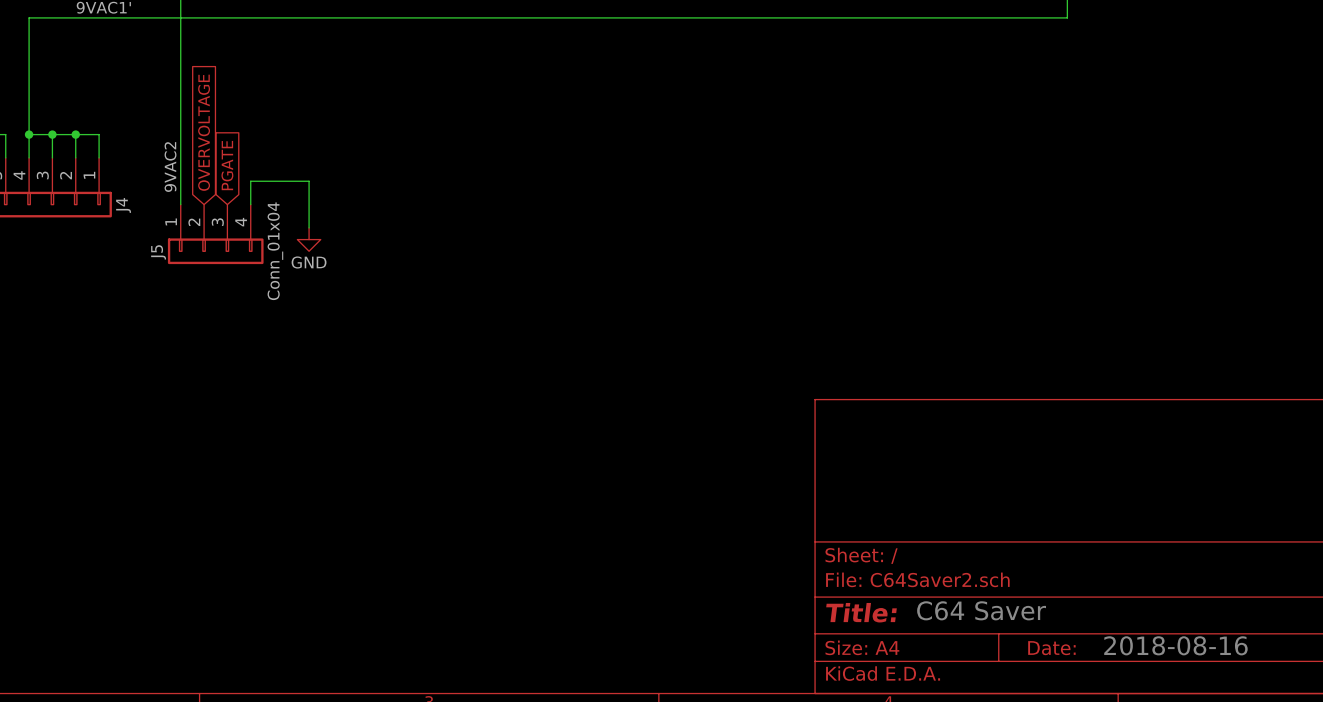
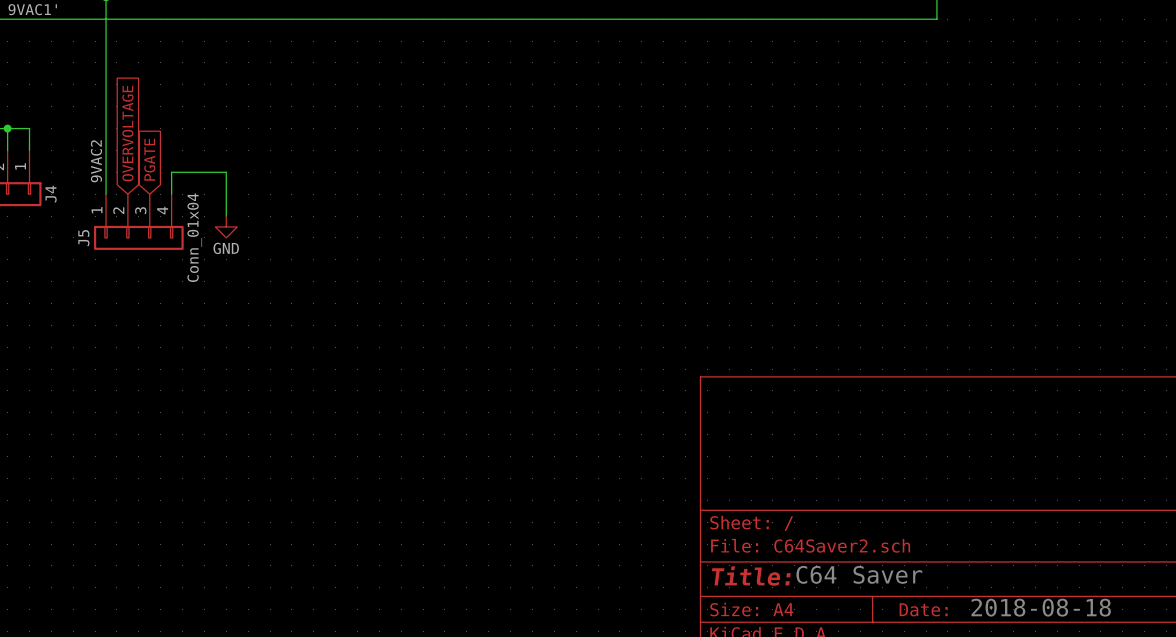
text: 2018-08-16 (1175, 645) -> 2018-08-18 (1041, 607)

